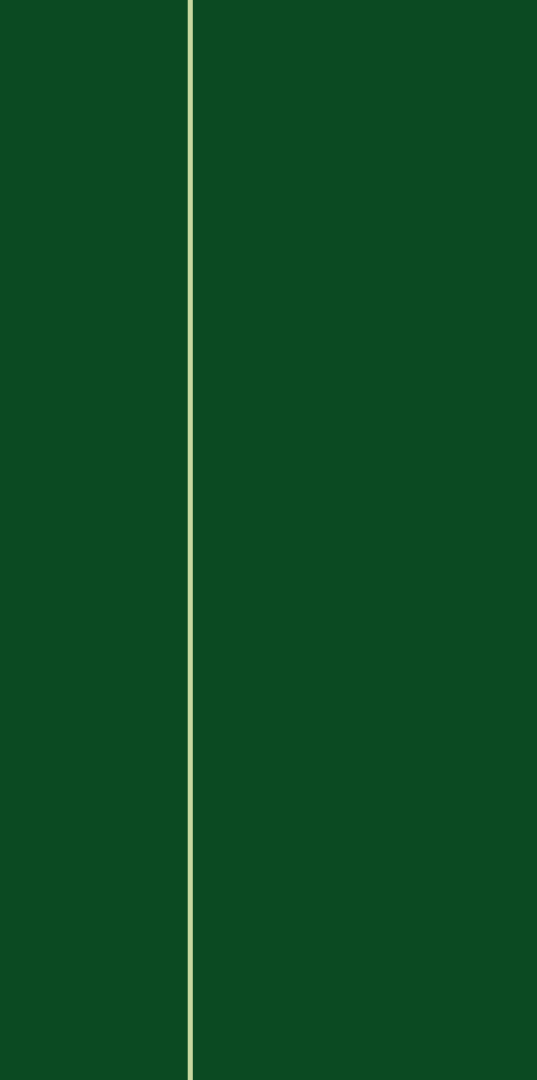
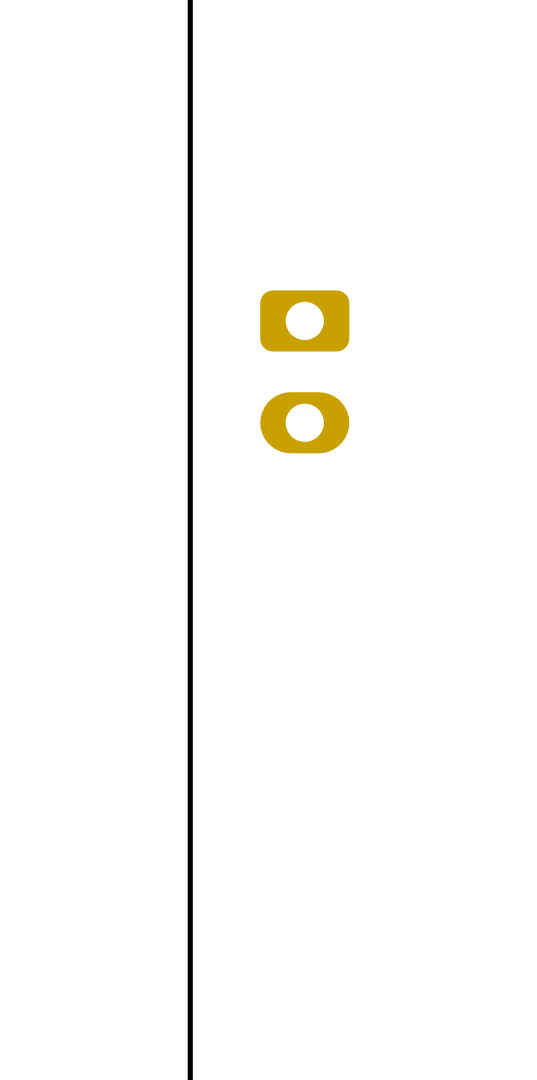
part: none -> (304, 371)

